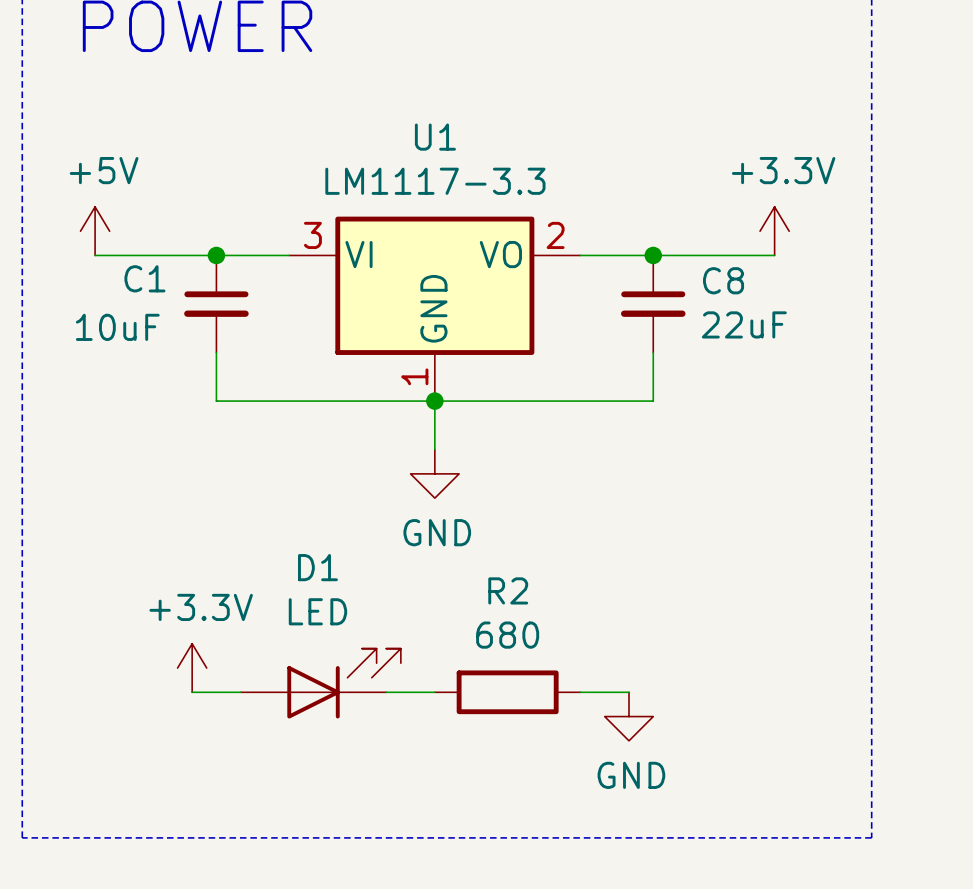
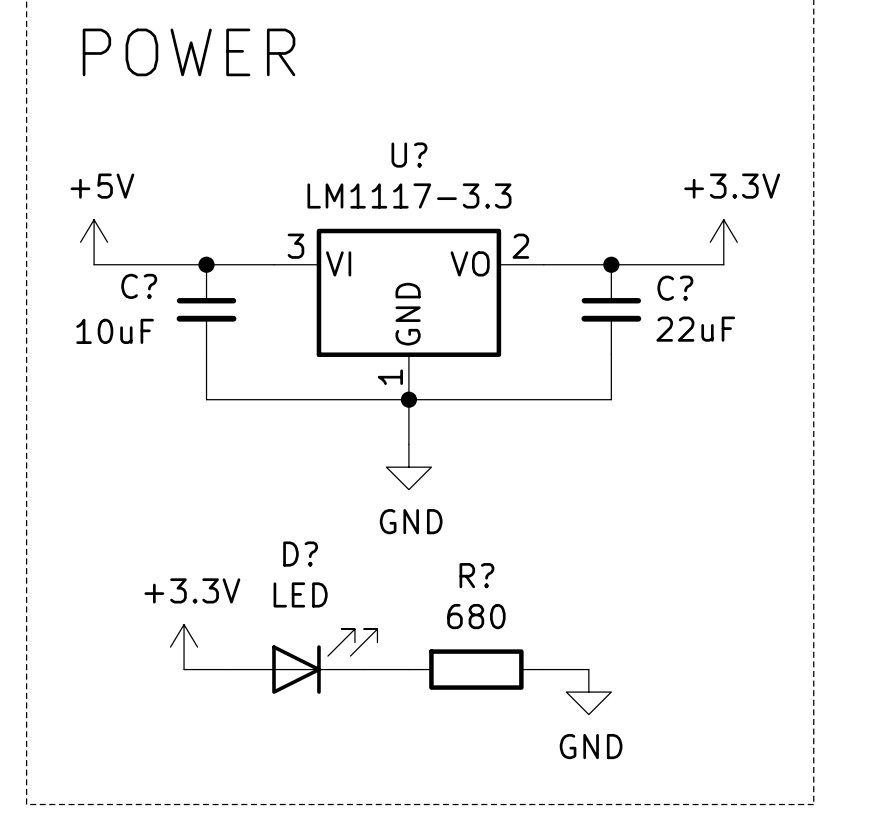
U1 name: U1 (435, 137) -> U? (409, 155)
C1 name: C1 (144, 278) -> C? (139, 286)
C8 name: C8 (723, 280) -> C? (675, 288)
D1 name: D1 (317, 567) -> D? (300, 554)
R2 name: R2 (508, 590) -> R? (476, 575)

